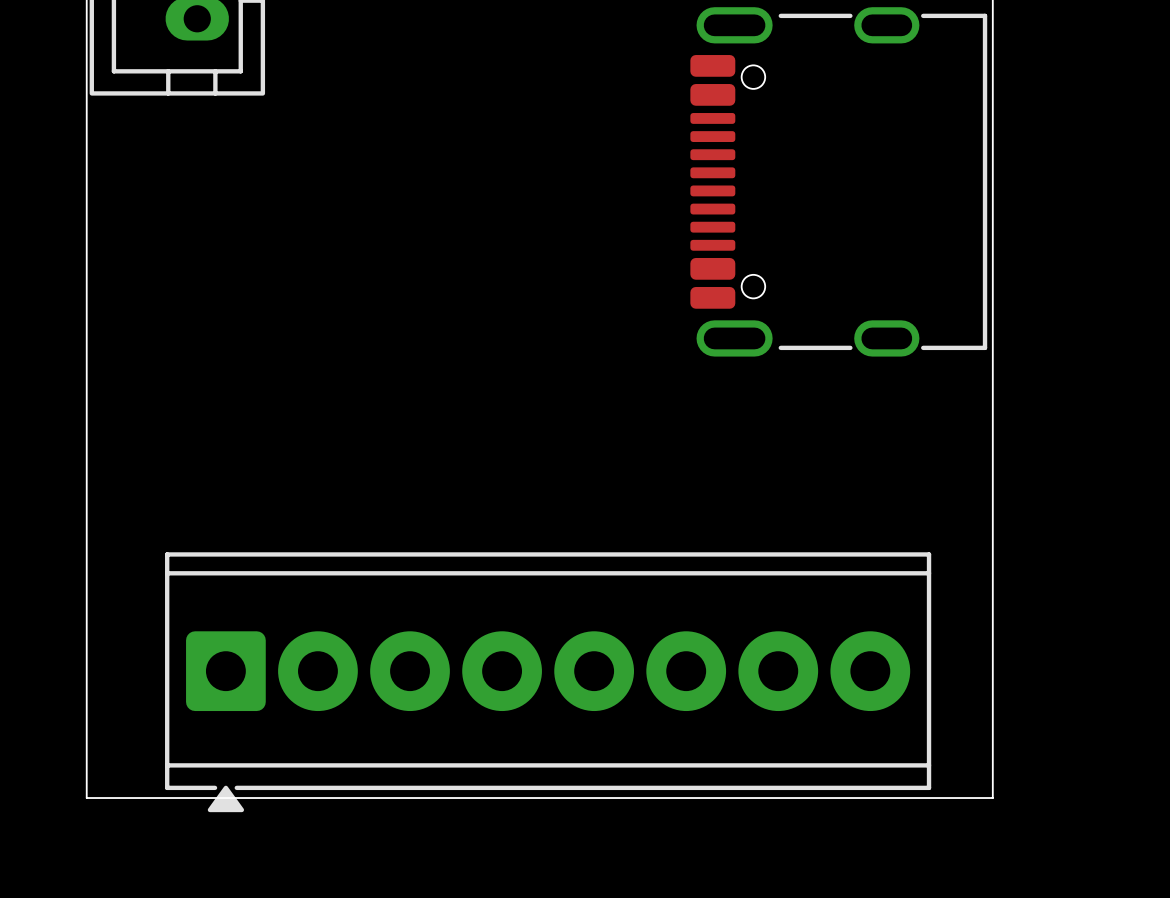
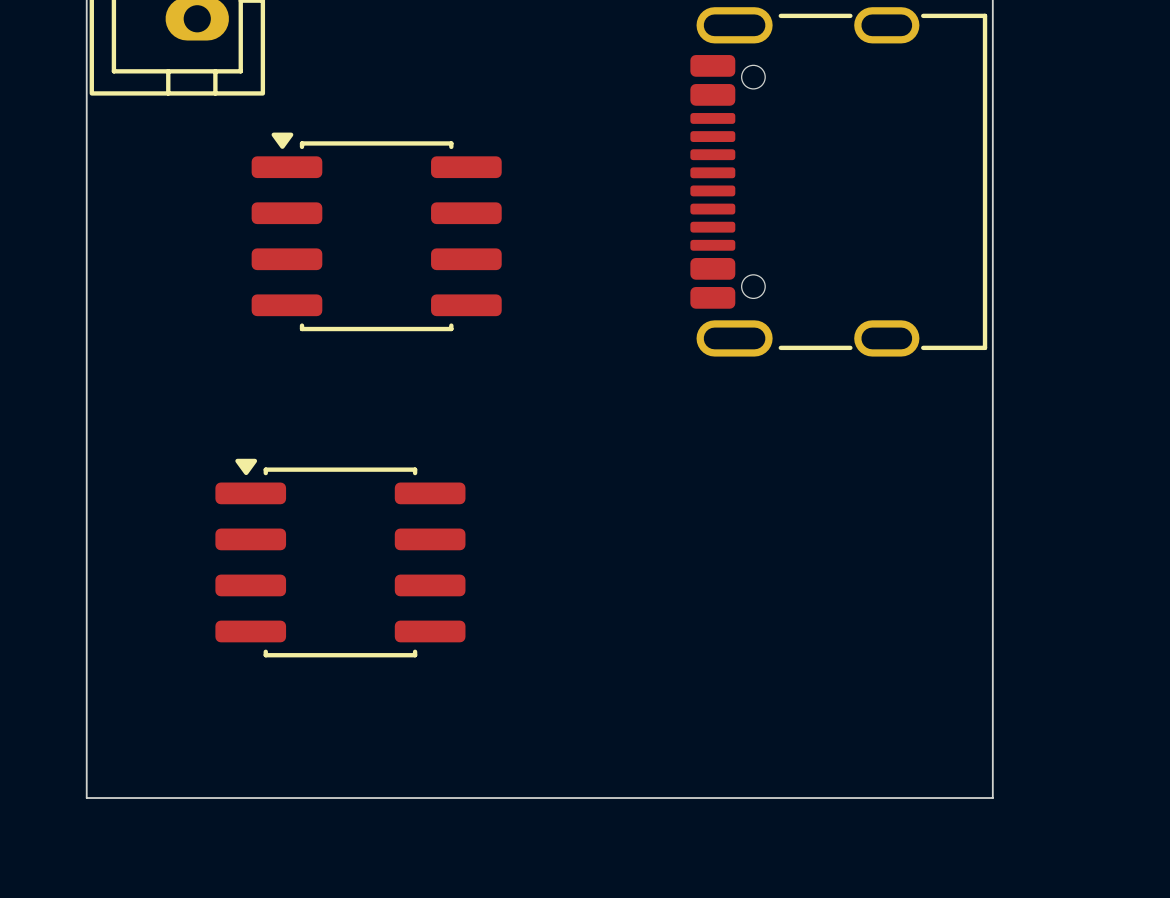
part: none -> (376, 231)
part: none -> (340, 558)
part: (548, 682) -> none

